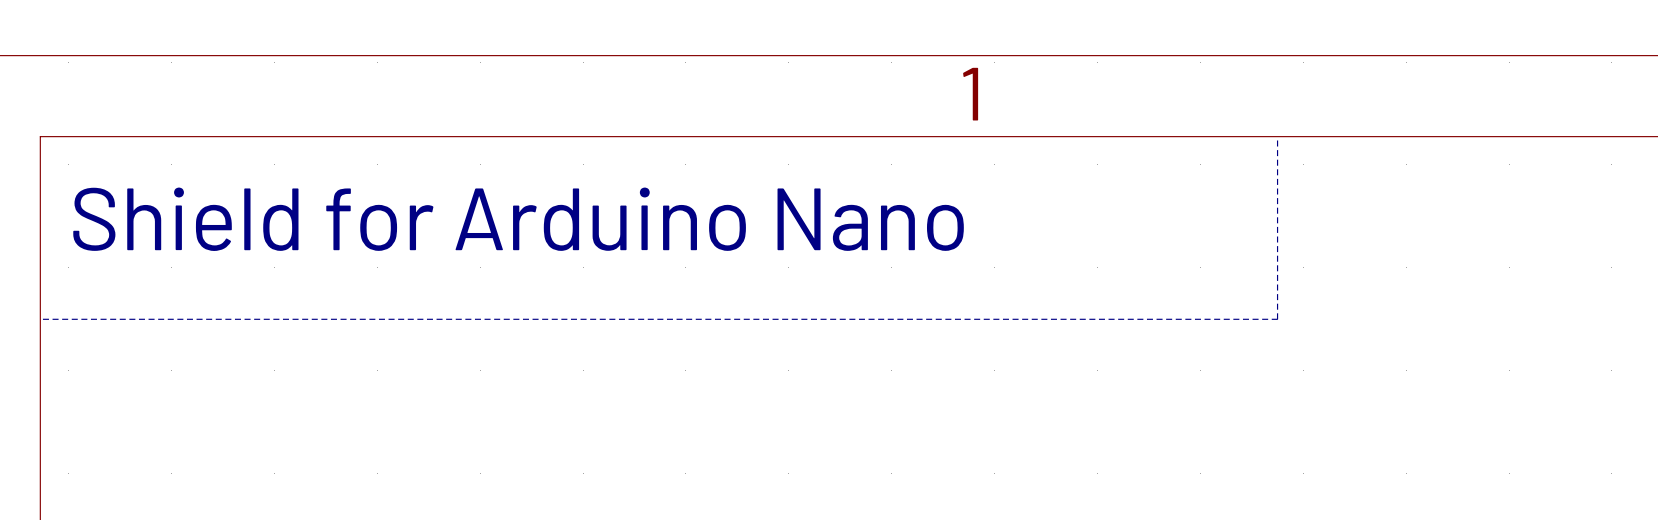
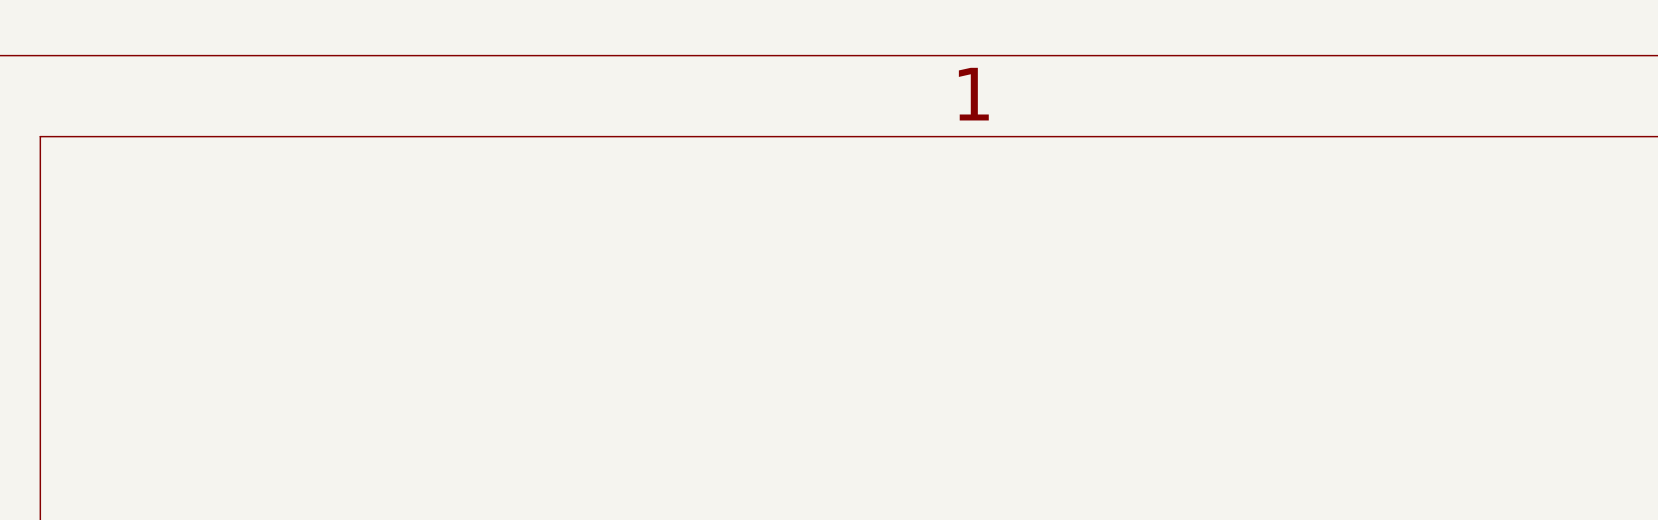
line: (1277, 139) (1277, 319) (42, 319) -> none
text: Shield for Arduino Nano (518, 219) -> none

